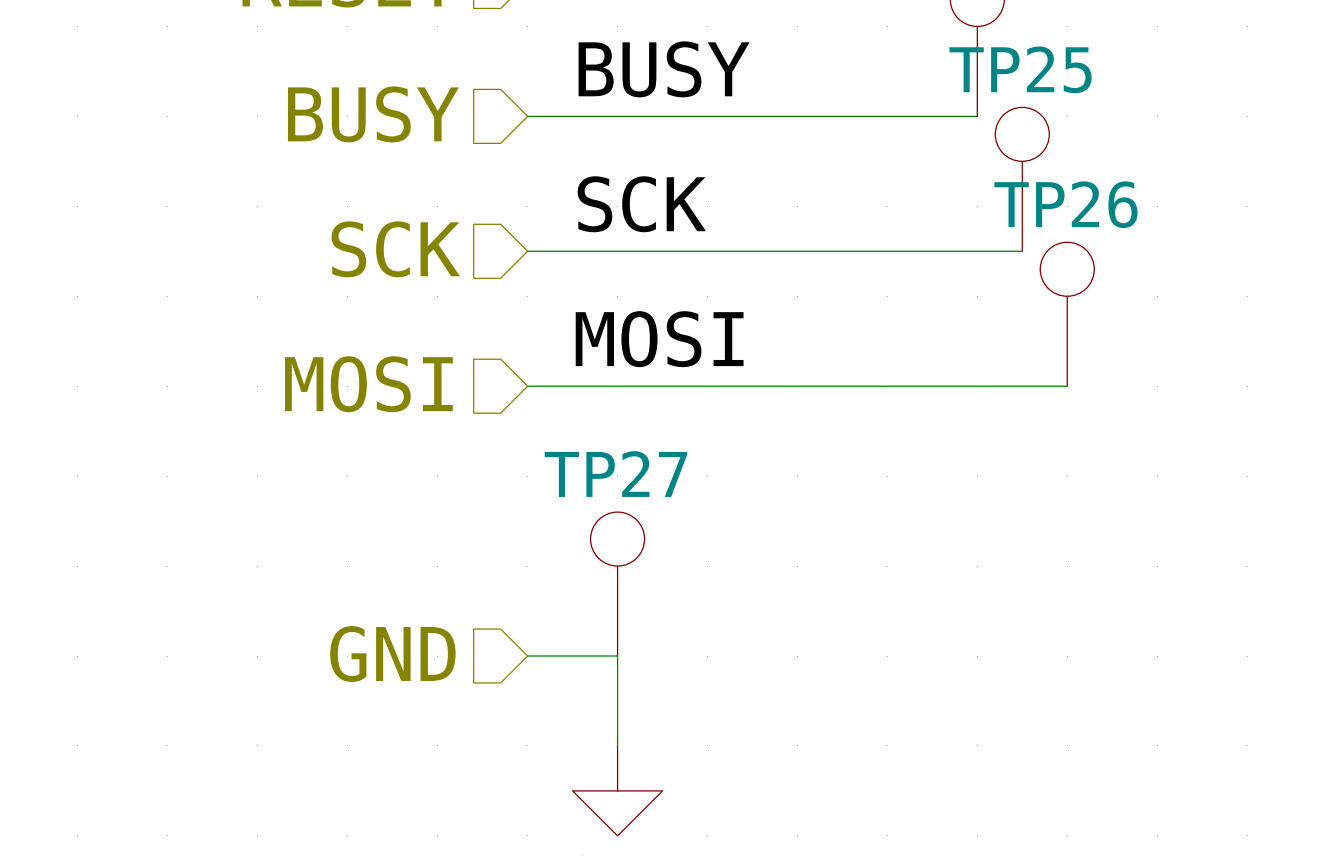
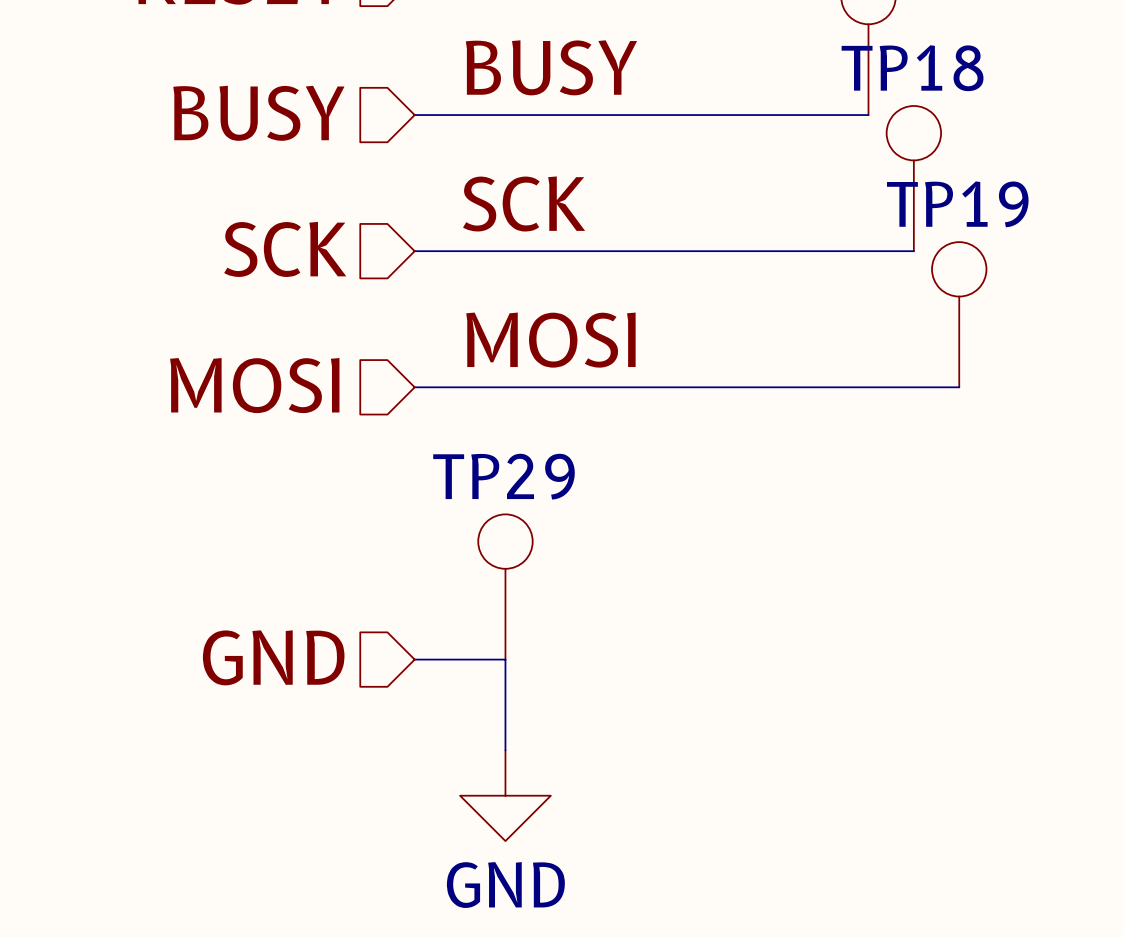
TP25 name: TP25 (1020, 69) -> TP18 (912, 68)
TP26 name: TP26 (1065, 204) -> TP19 (957, 204)
TP27 name: TP27 (615, 474) -> TP29 (504, 476)

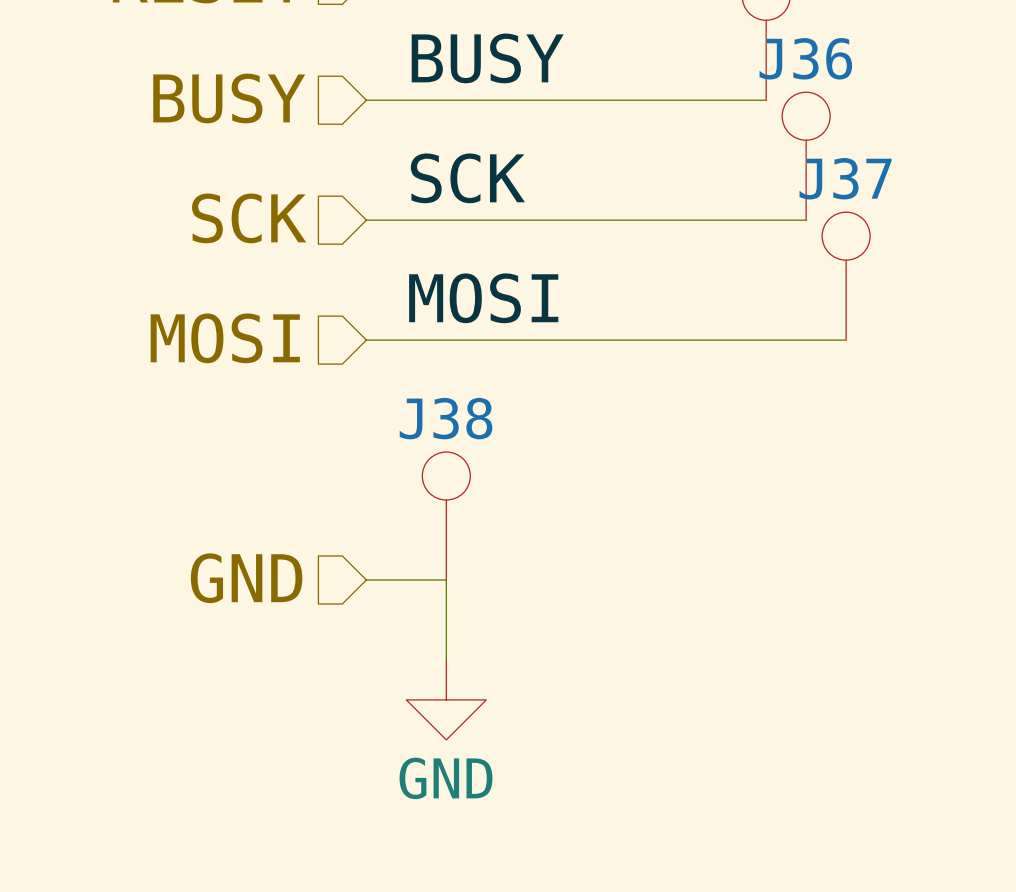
TP18 name: TP18 (912, 68) -> J36 (805, 58)
TP19 name: TP19 (957, 204) -> J37 (845, 178)
TP29 name: TP29 (504, 476) -> J38 (446, 418)

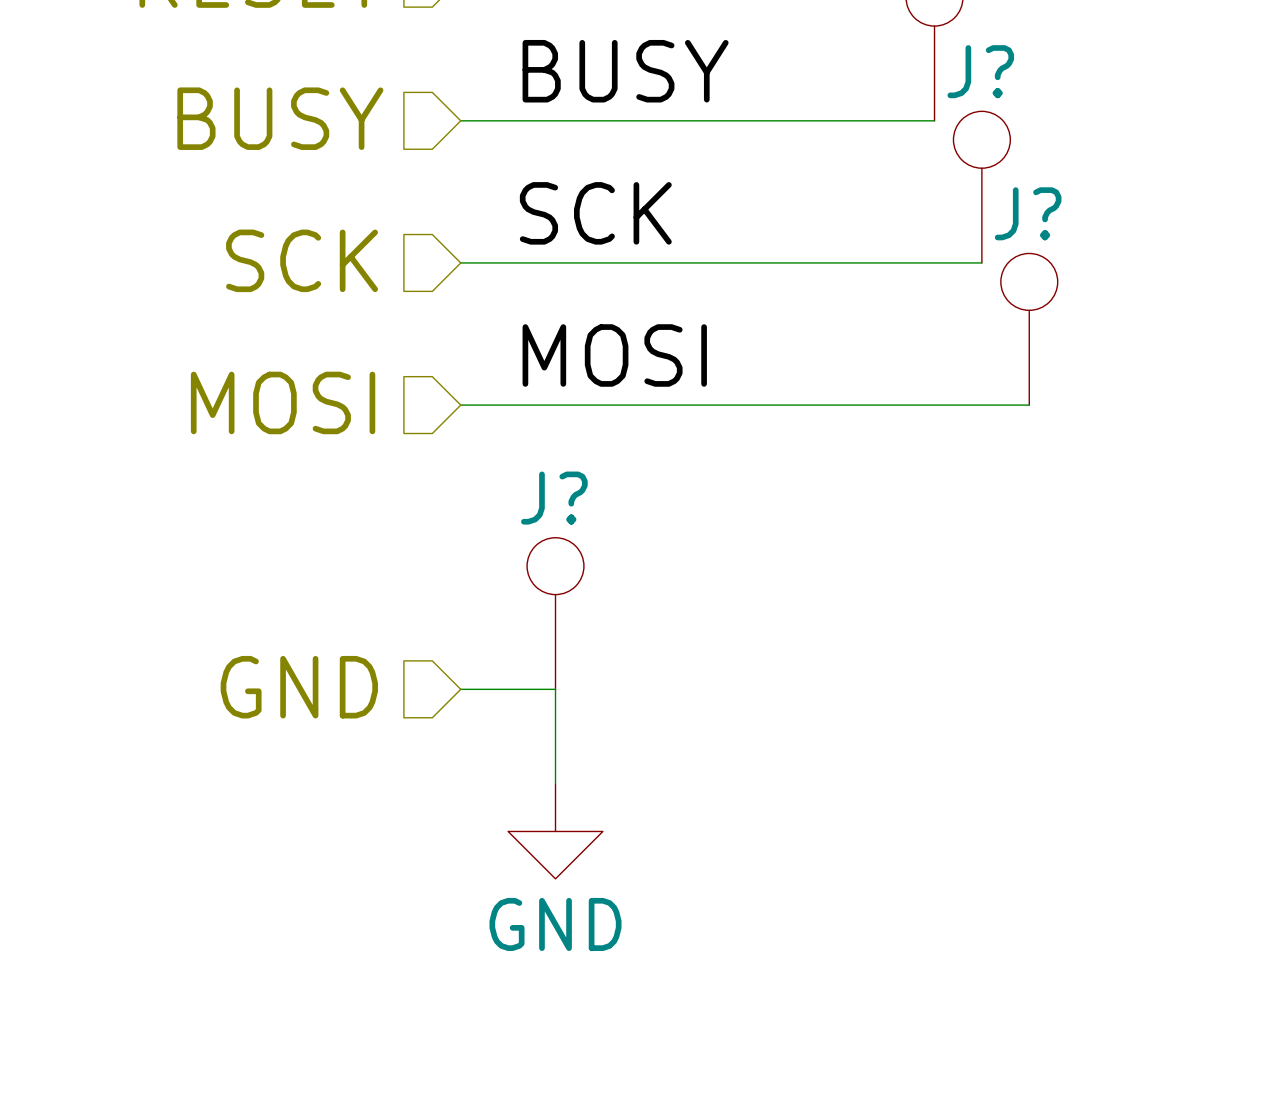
J36 name: J36 (805, 58) -> J? (980, 71)
J37 name: J37 (845, 178) -> J? (1028, 213)
J38 name: J38 (446, 418) -> J? (554, 498)

